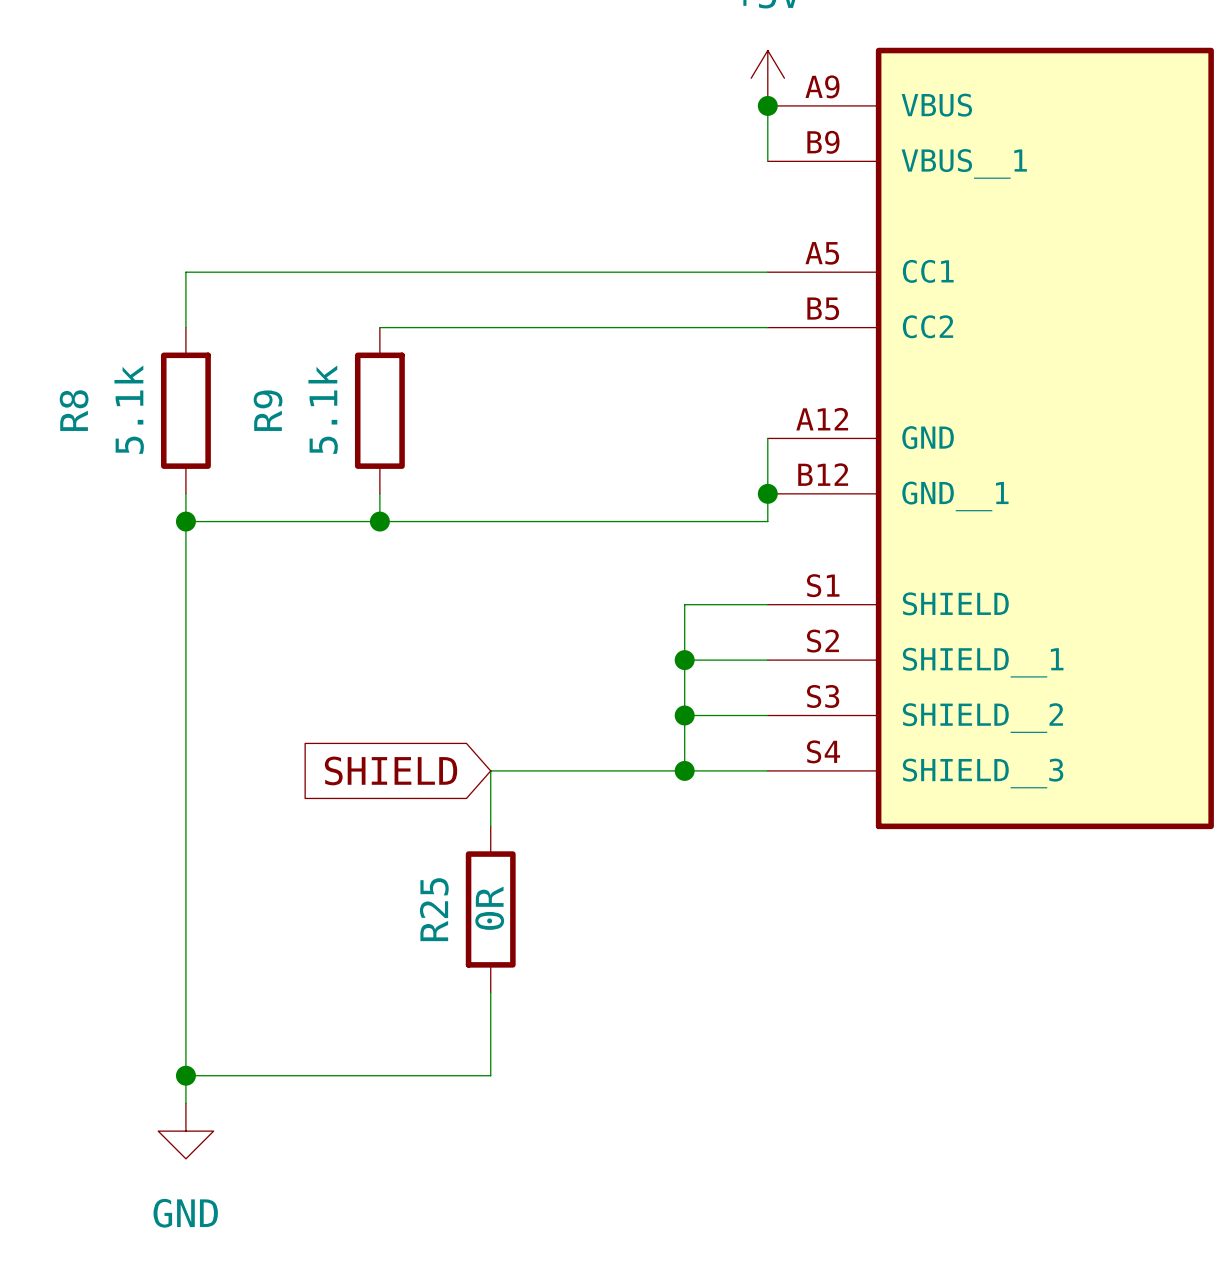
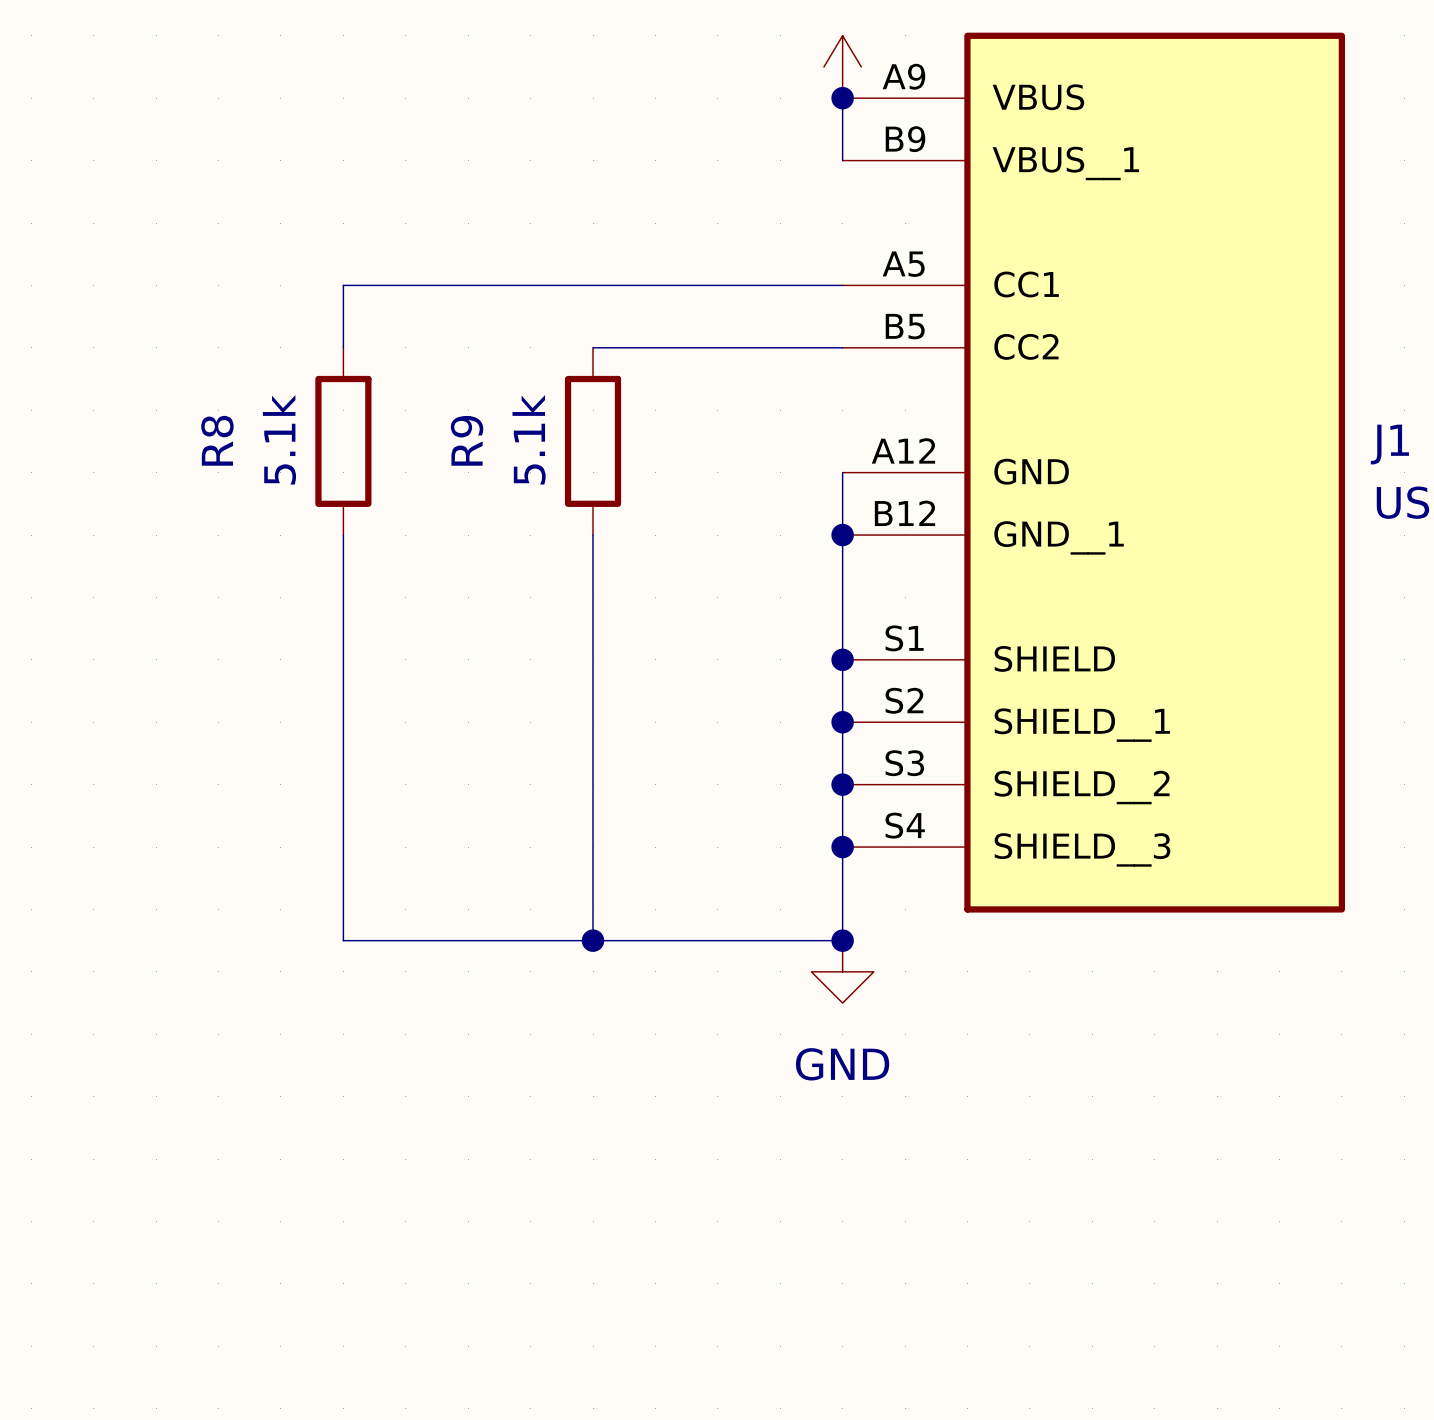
wire: (324, 272) (185, 272) (185, 327) -> (343, 285) (343, 347)
wire: (379, 327) (546, 327) -> none
R8 position: (185, 410) -> (343, 441)
R9 position: (379, 410) -> (593, 441)
wire: (185, 493) (185, 1103) -> none
wire: (379, 493) (379, 521) -> none
wire: none -> (593, 535) (593, 940)
wire: (185, 521) (767, 521) -> (343, 535) (343, 940) (842, 940) (842, 566)
junction: (185, 521) -> none
junction: (379, 521) -> none
wire: (767, 604) (684, 604) (684, 770) -> none
junction: none -> (842, 659)
wire: (684, 660) (767, 660) -> none
junction: (684, 660) -> none
junction: none -> (842, 722)
wire: (684, 715) (767, 715) -> none
junction: (684, 715) -> none
junction: none -> (842, 784)
global label: SHIELD (391, 770) -> none
junction: (684, 770) -> none
wire: (767, 770) (490, 770) (490, 826) -> none
junction: none -> (842, 847)
junction: none -> (593, 940)
junction: none -> (842, 940)
power symbol: none -> GND (842, 971)
R25: 0R (490, 909) -> none
wire: (490, 992) (490, 1075) (185, 1075) -> none
junction: (185, 1075) -> none
power symbol: GND (185, 1131) -> none

